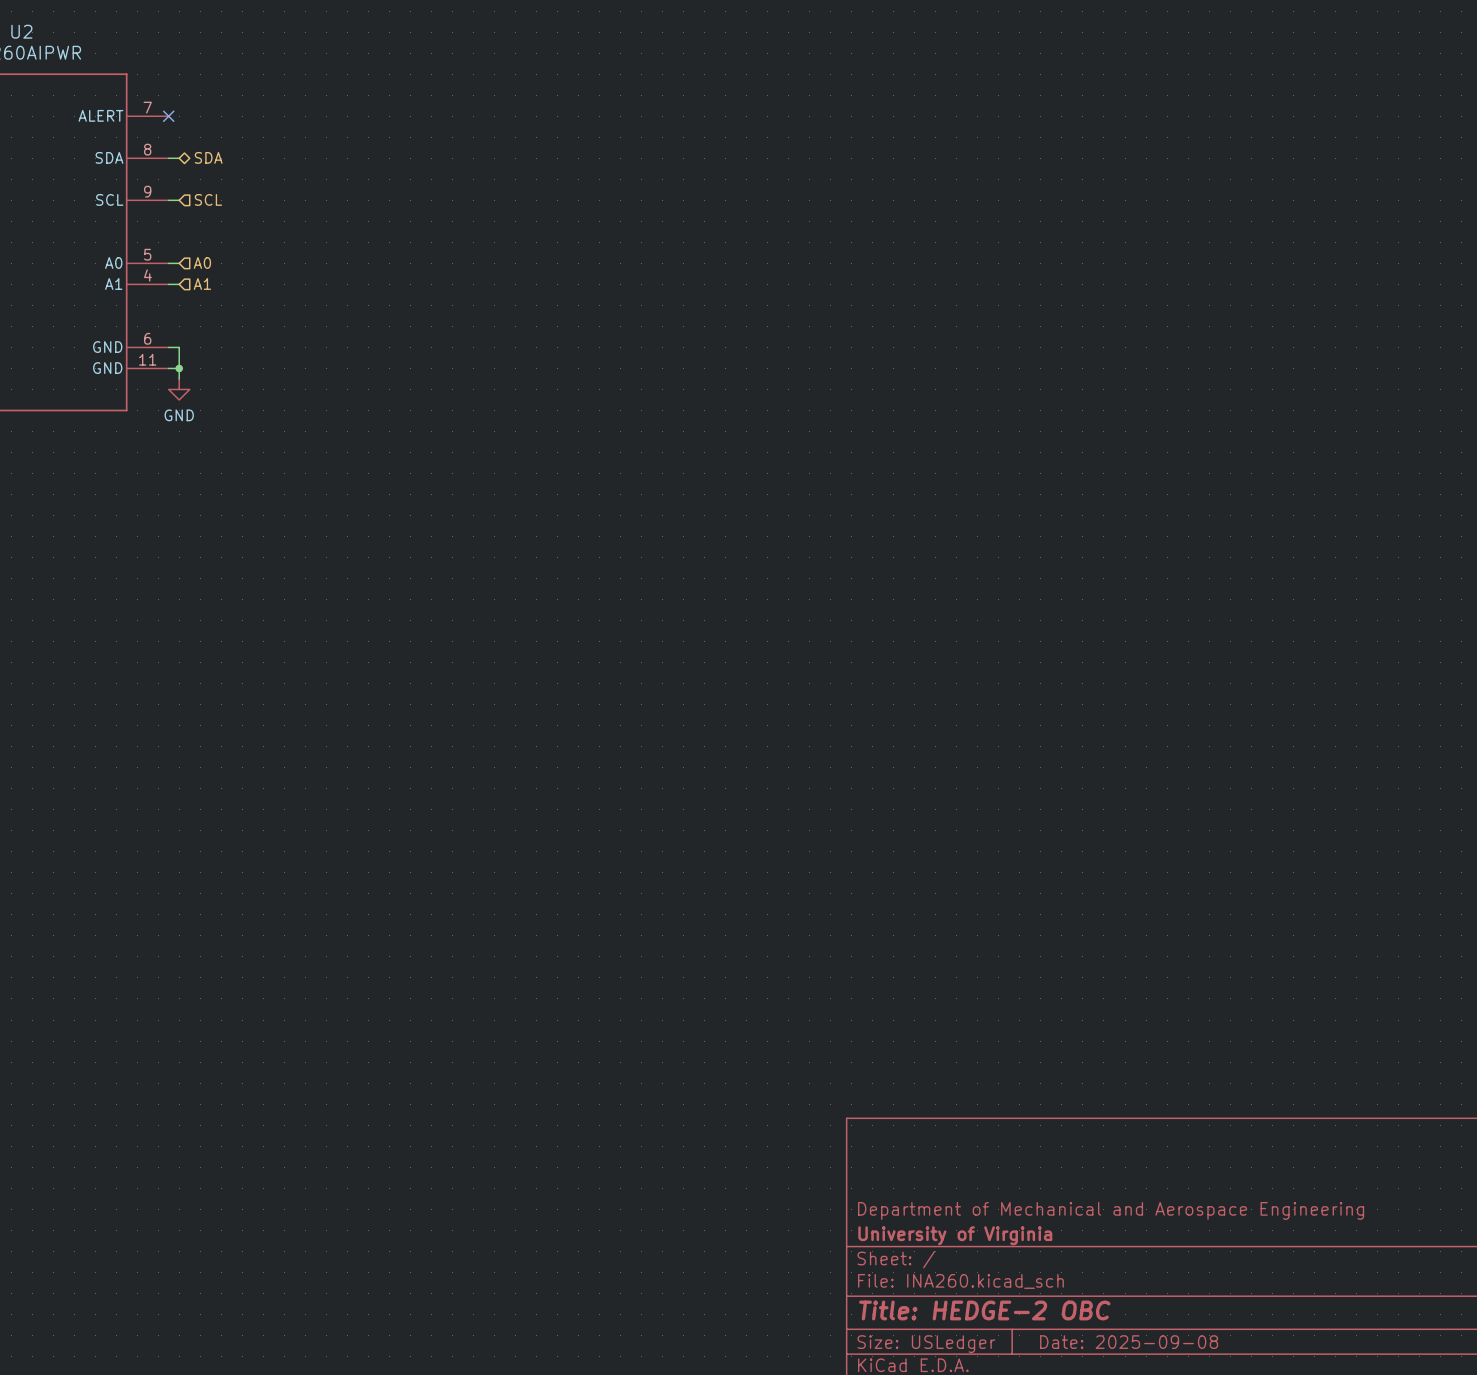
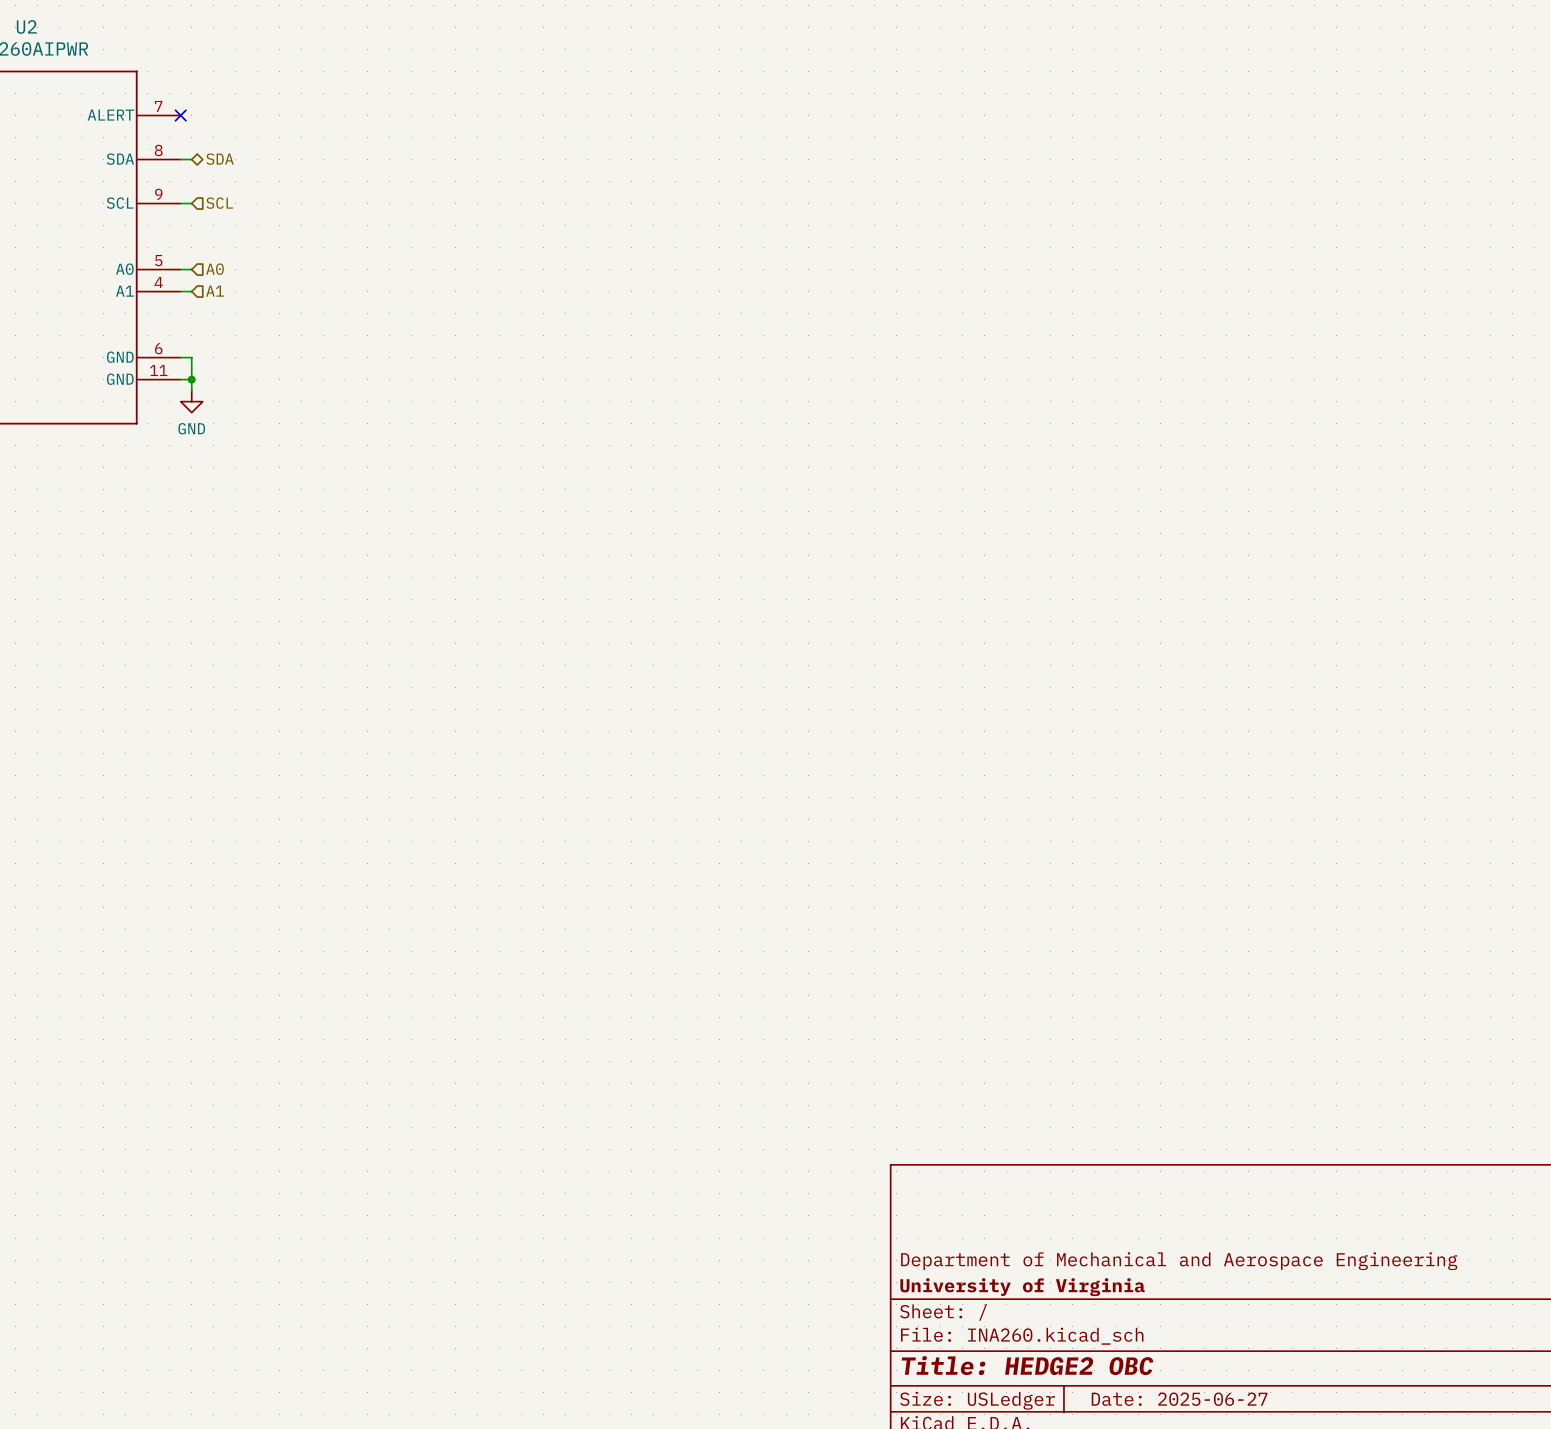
title block: Title: HEDGE-2 OBC (984, 1310) -> Title: HEDGE2 OBC (1027, 1365)
title block: Date: 2025-09-08 (1129, 1342) -> Date: 2025-06-27 (1179, 1399)

